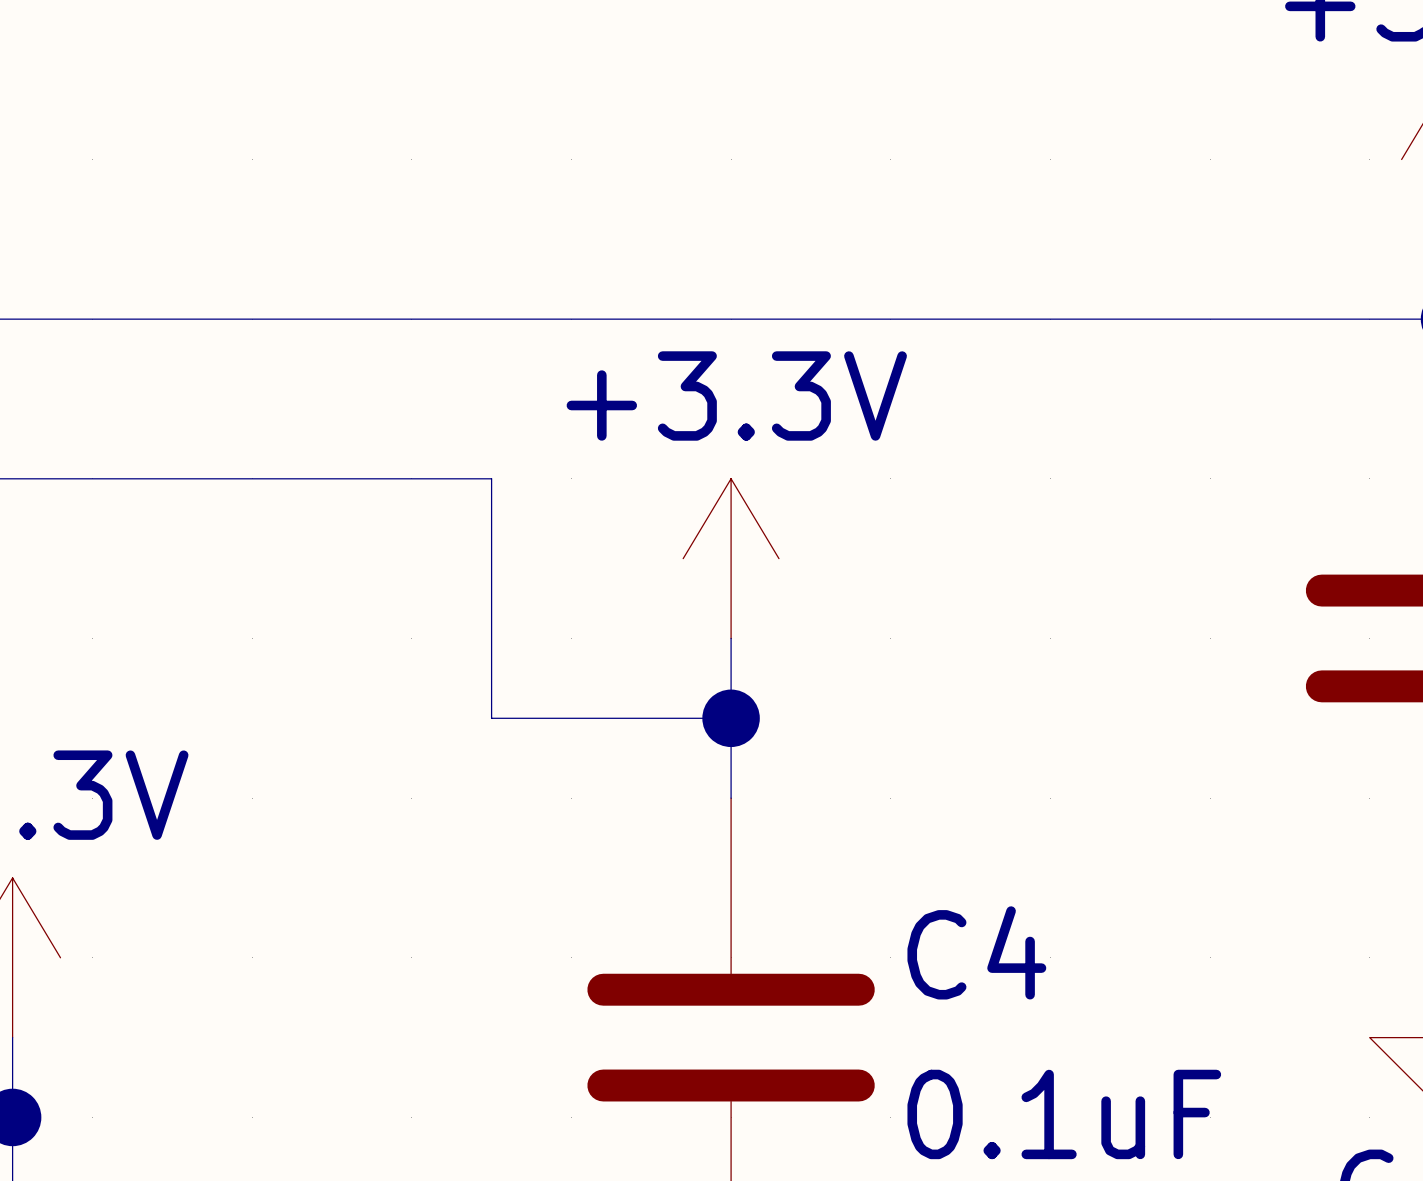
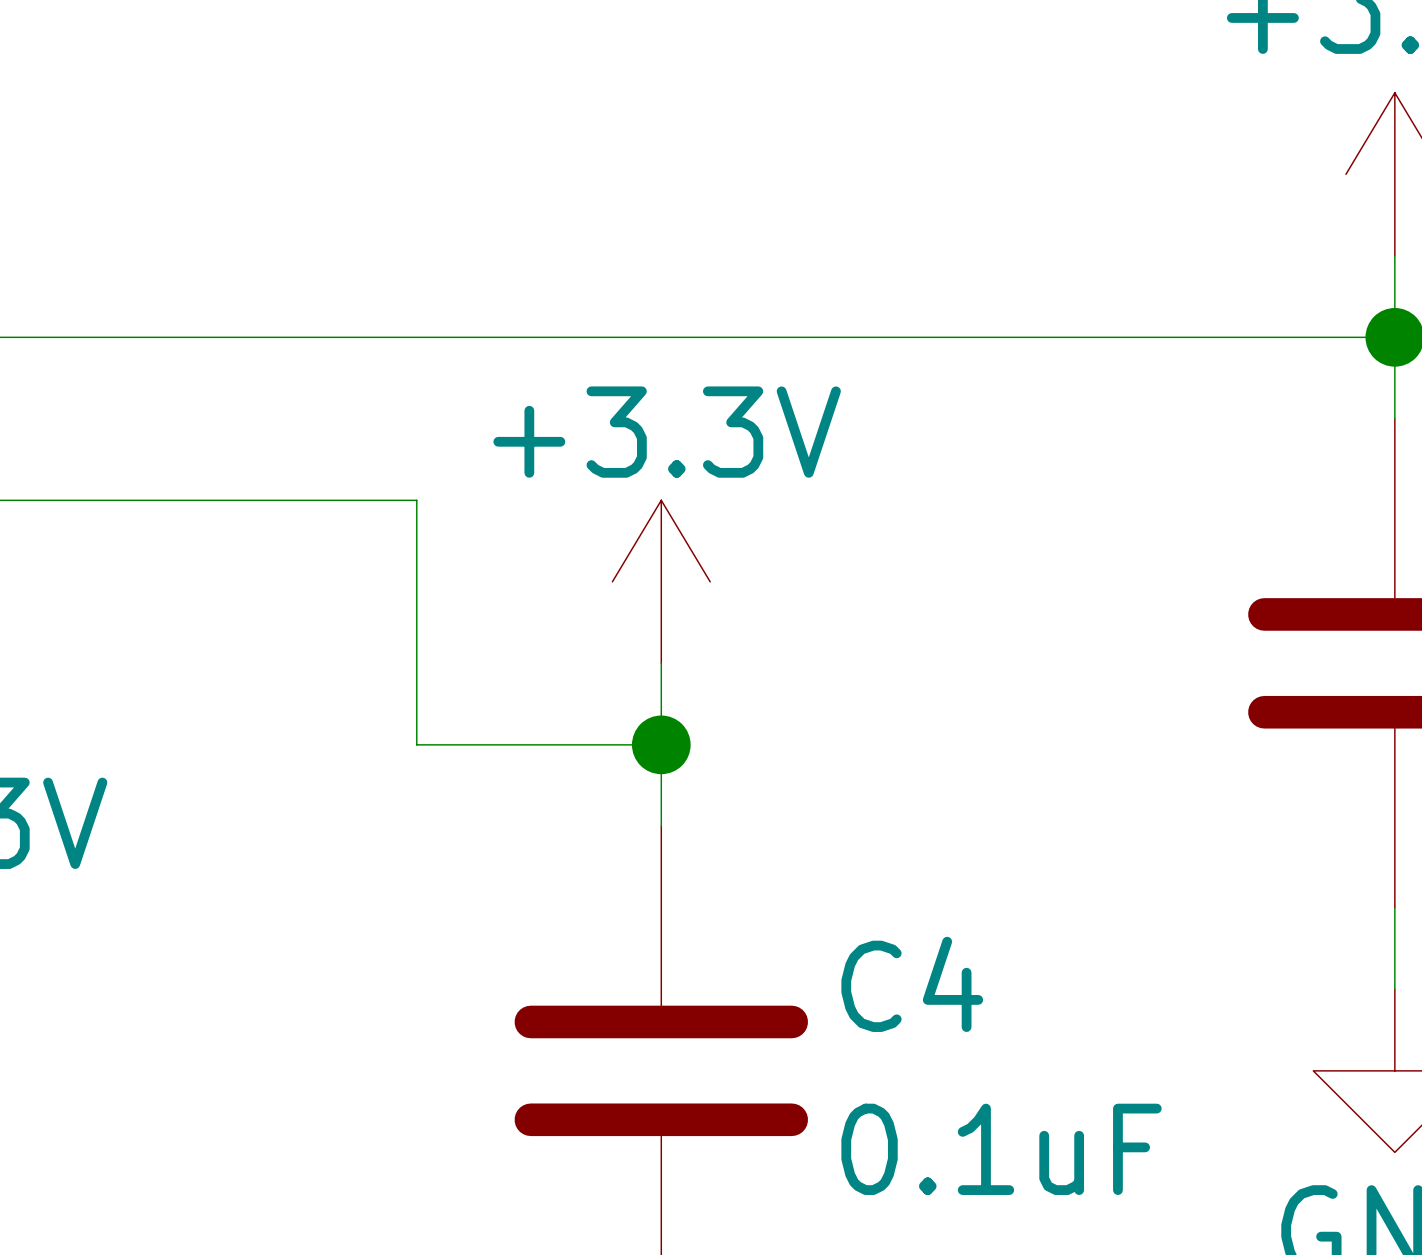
power symbol text position: +3.3V (736, 395) -> +3.3V (667, 432)

